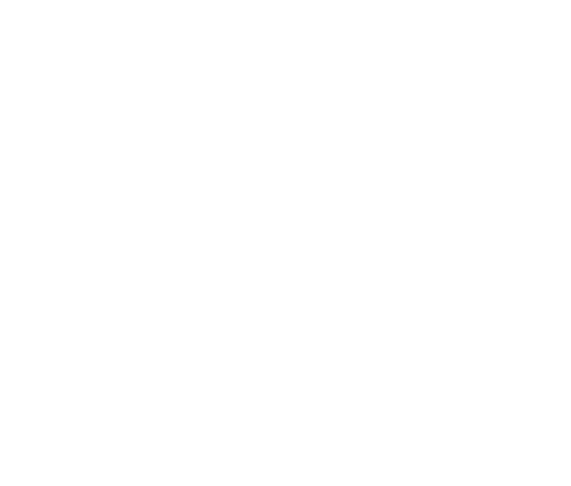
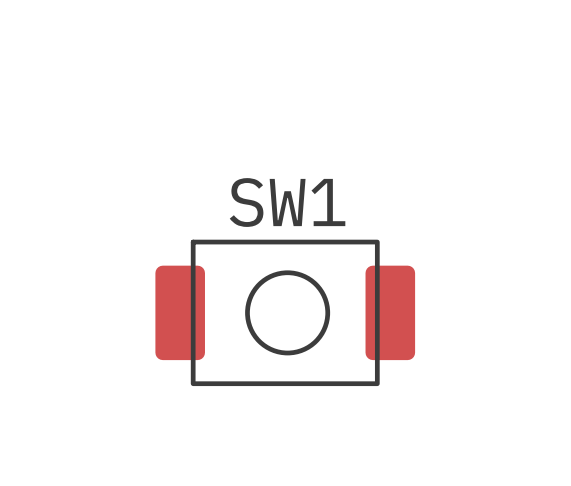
SW1: none -> (285, 312)

